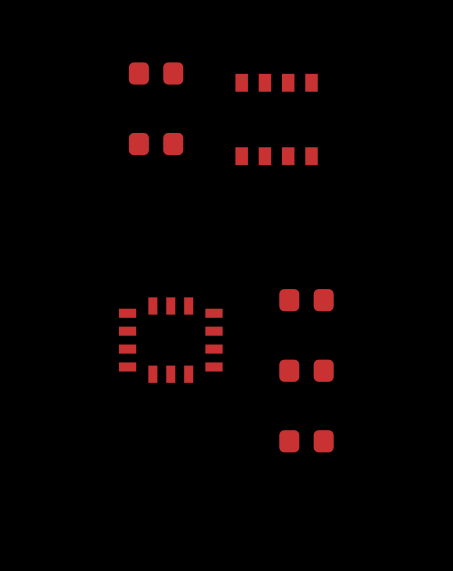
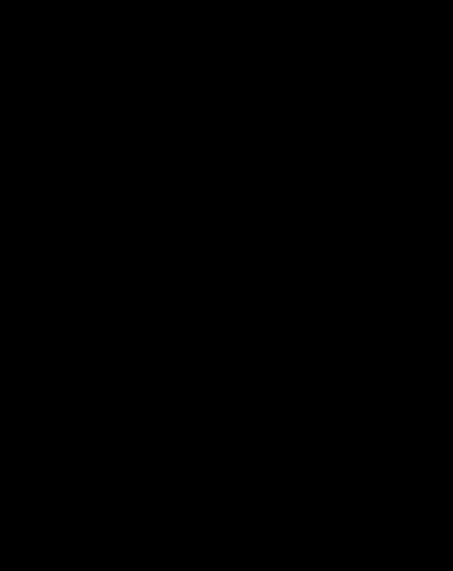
part: (156, 73) -> none
part: (276, 119) -> none
part: (156, 144) -> none
part: (306, 300) -> none
part: (170, 340) -> none
part: (306, 370) -> none
part: (306, 441) -> none

